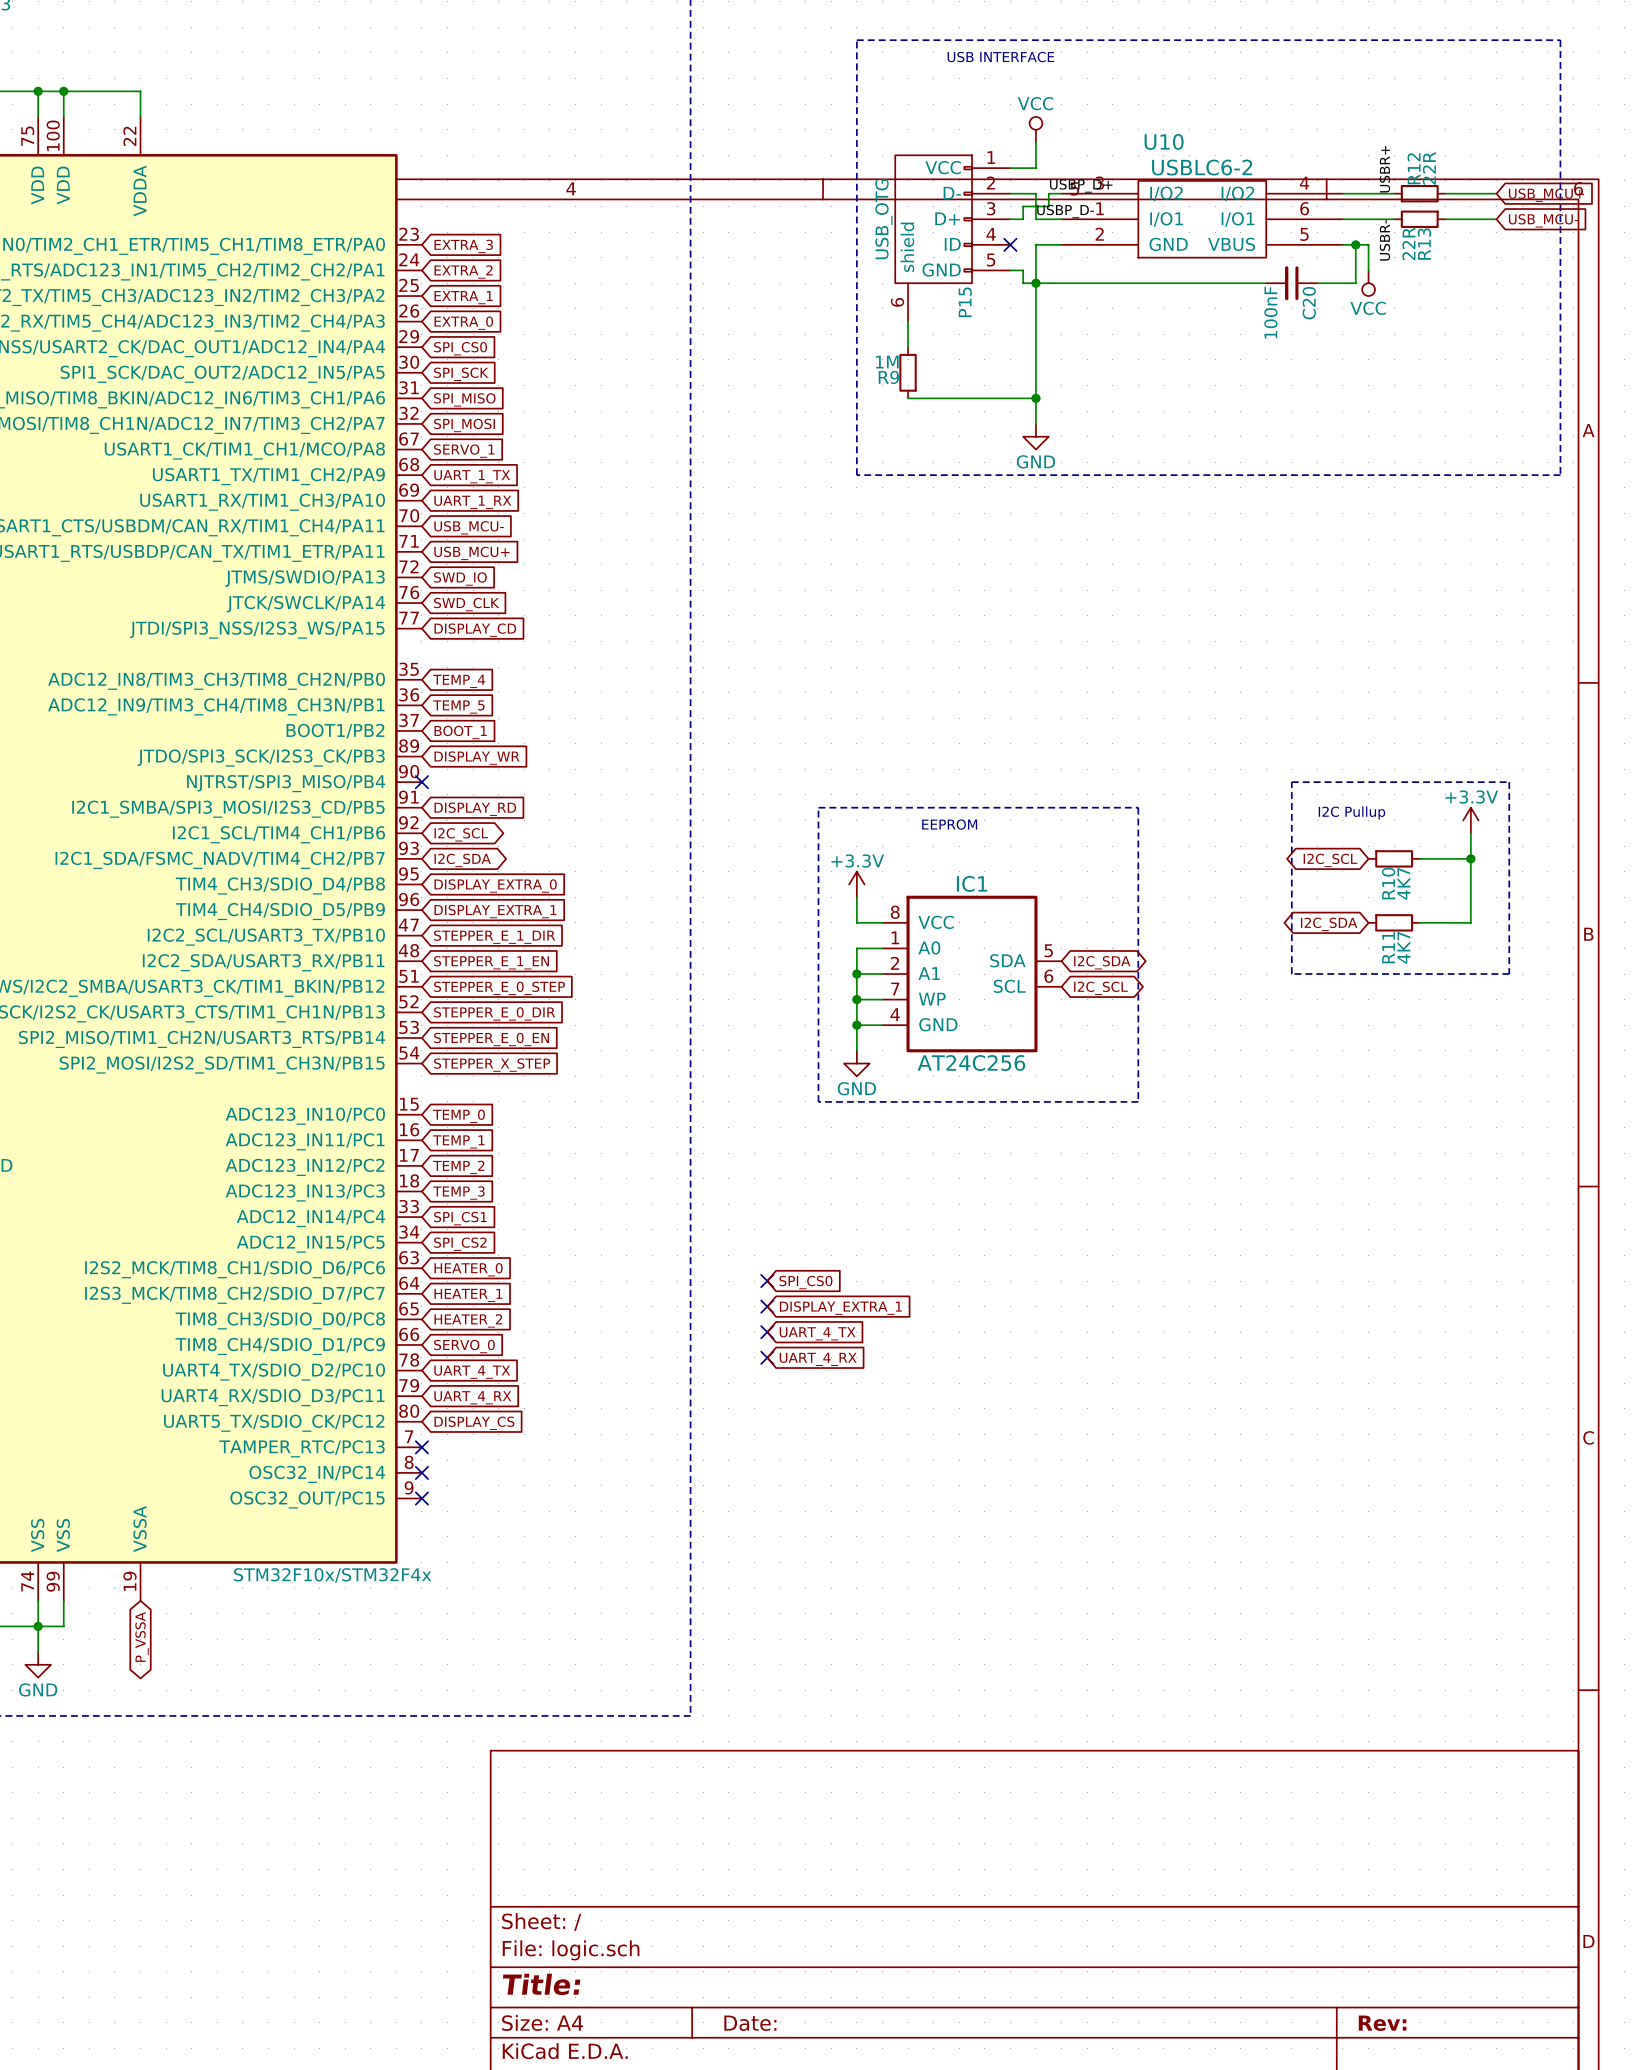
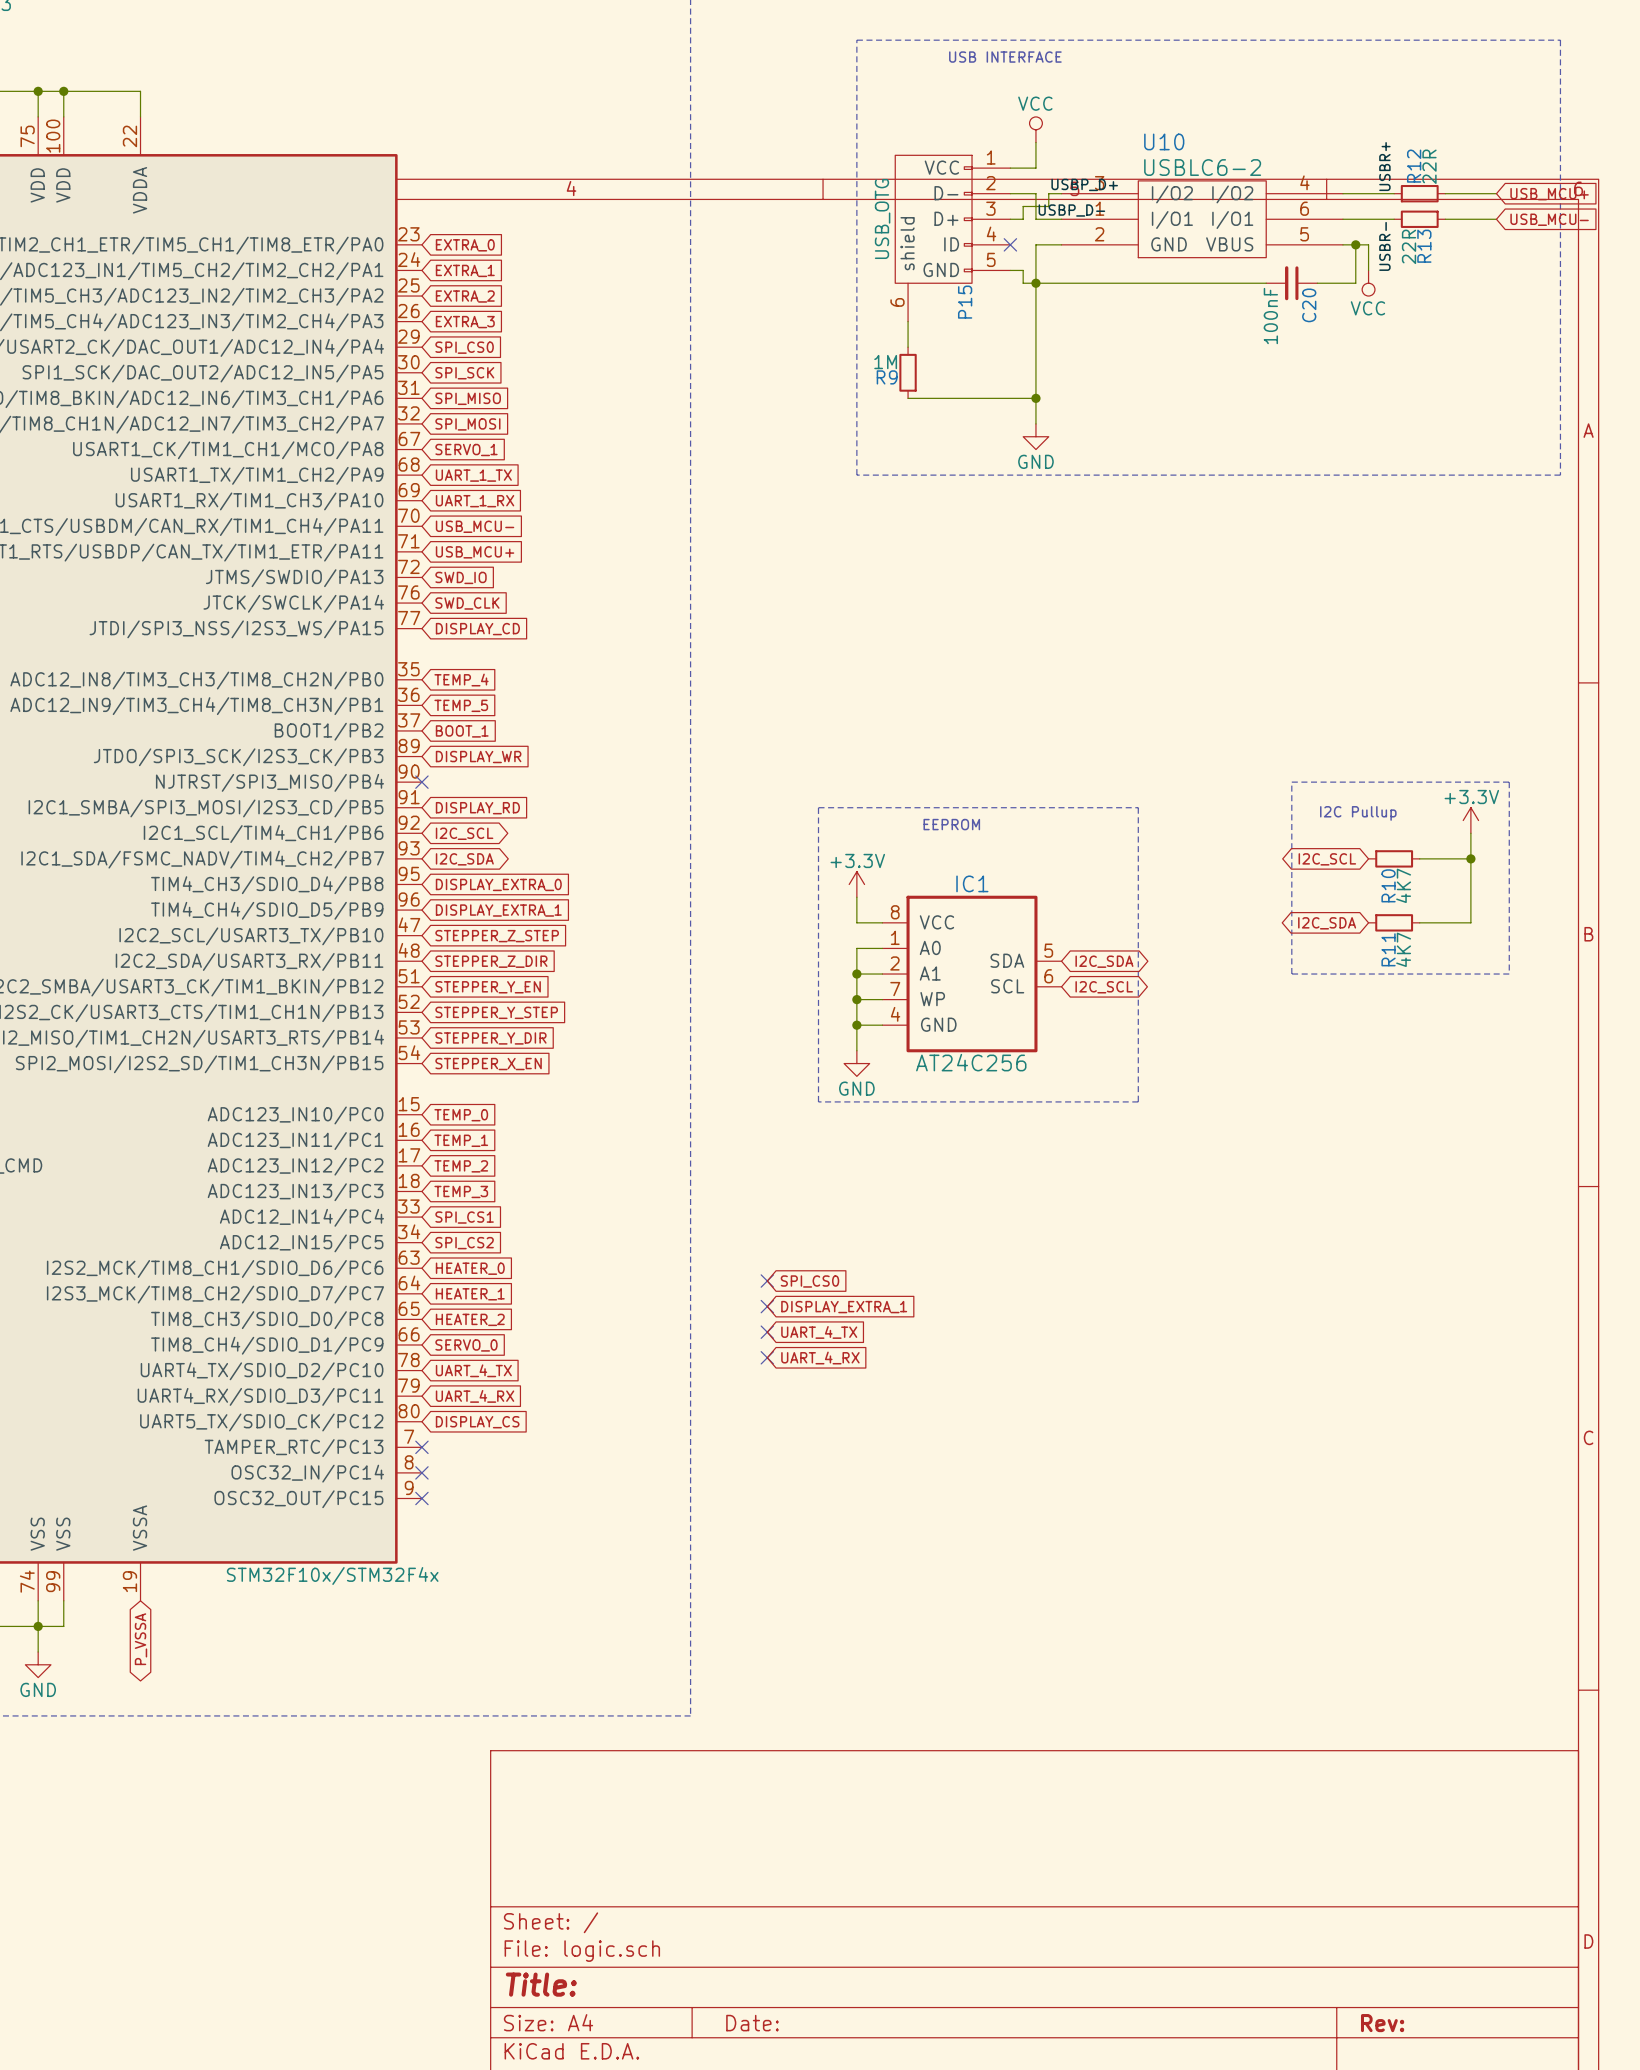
global label: EXTRA_3 (463, 246) -> EXTRA_0 (465, 245)
global label: EXTRA_2 (463, 271) -> EXTRA_1 (465, 270)
global label: EXTRA_1 (463, 297) -> EXTRA_2 (465, 296)
global label: EXTRA_0 (463, 323) -> EXTRA_3 (465, 322)
global label: STEPPER_E_1_DIR (494, 937) -> STEPPER_Z_STEP (497, 936)
global label: STEPPER_E_1_EN (491, 962) -> STEPPER_Z_DIR (491, 961)
global label: STEPPER_E_0_STEP (499, 988) -> STEPPER_Y_EN (488, 987)
global label: STEPPER_E_0_DIR (494, 1013) -> STEPPER_Y_STEP (496, 1012)
global label: STEPPER_E_0_EN (491, 1039) -> STEPPER_Y_DIR (490, 1038)
global label: STEPPER_X_STEP (492, 1065) -> STEPPER_X_EN (488, 1064)

